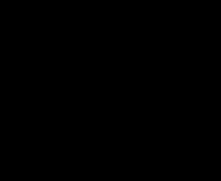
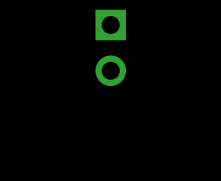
part: none -> (110, 47)

